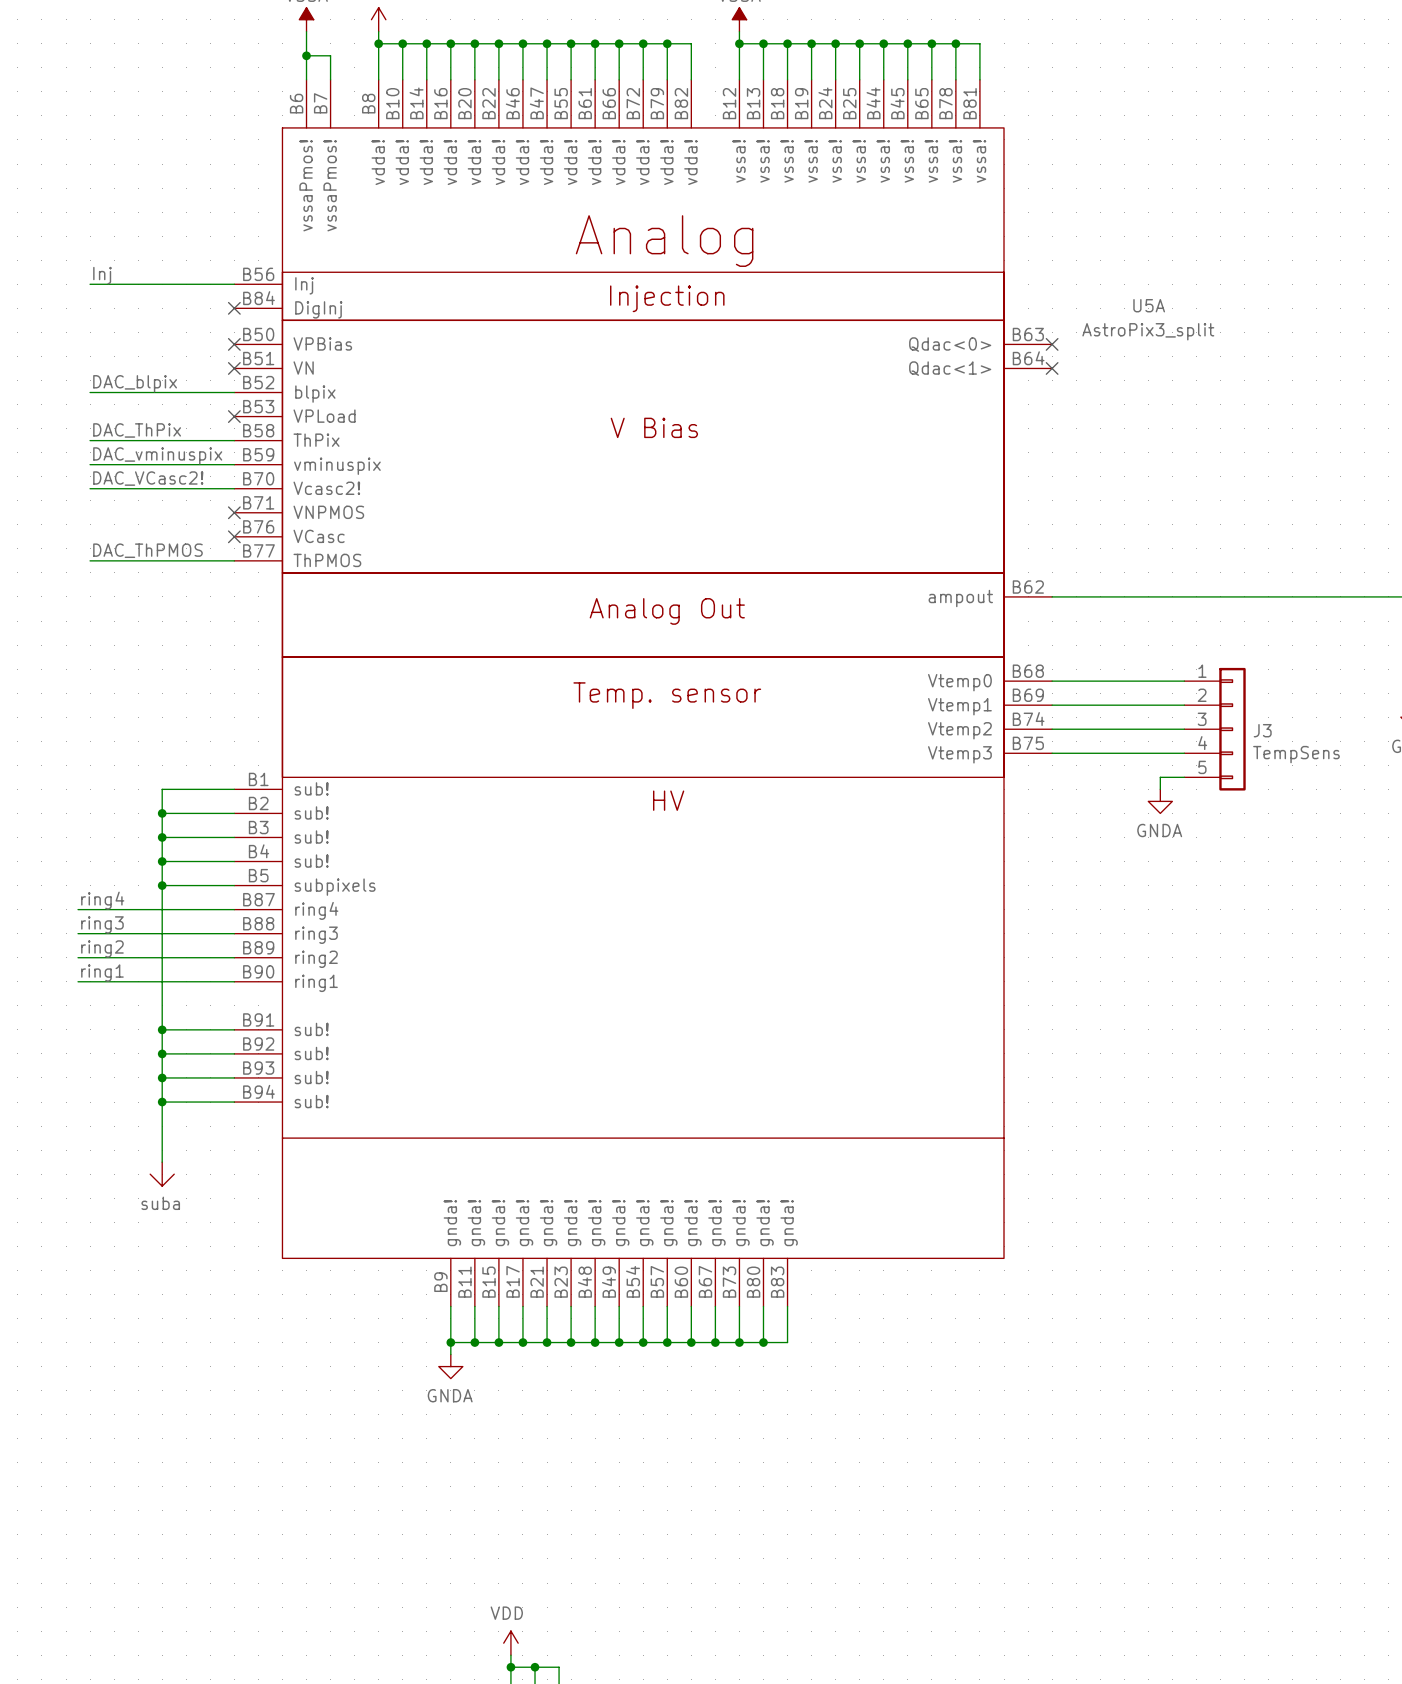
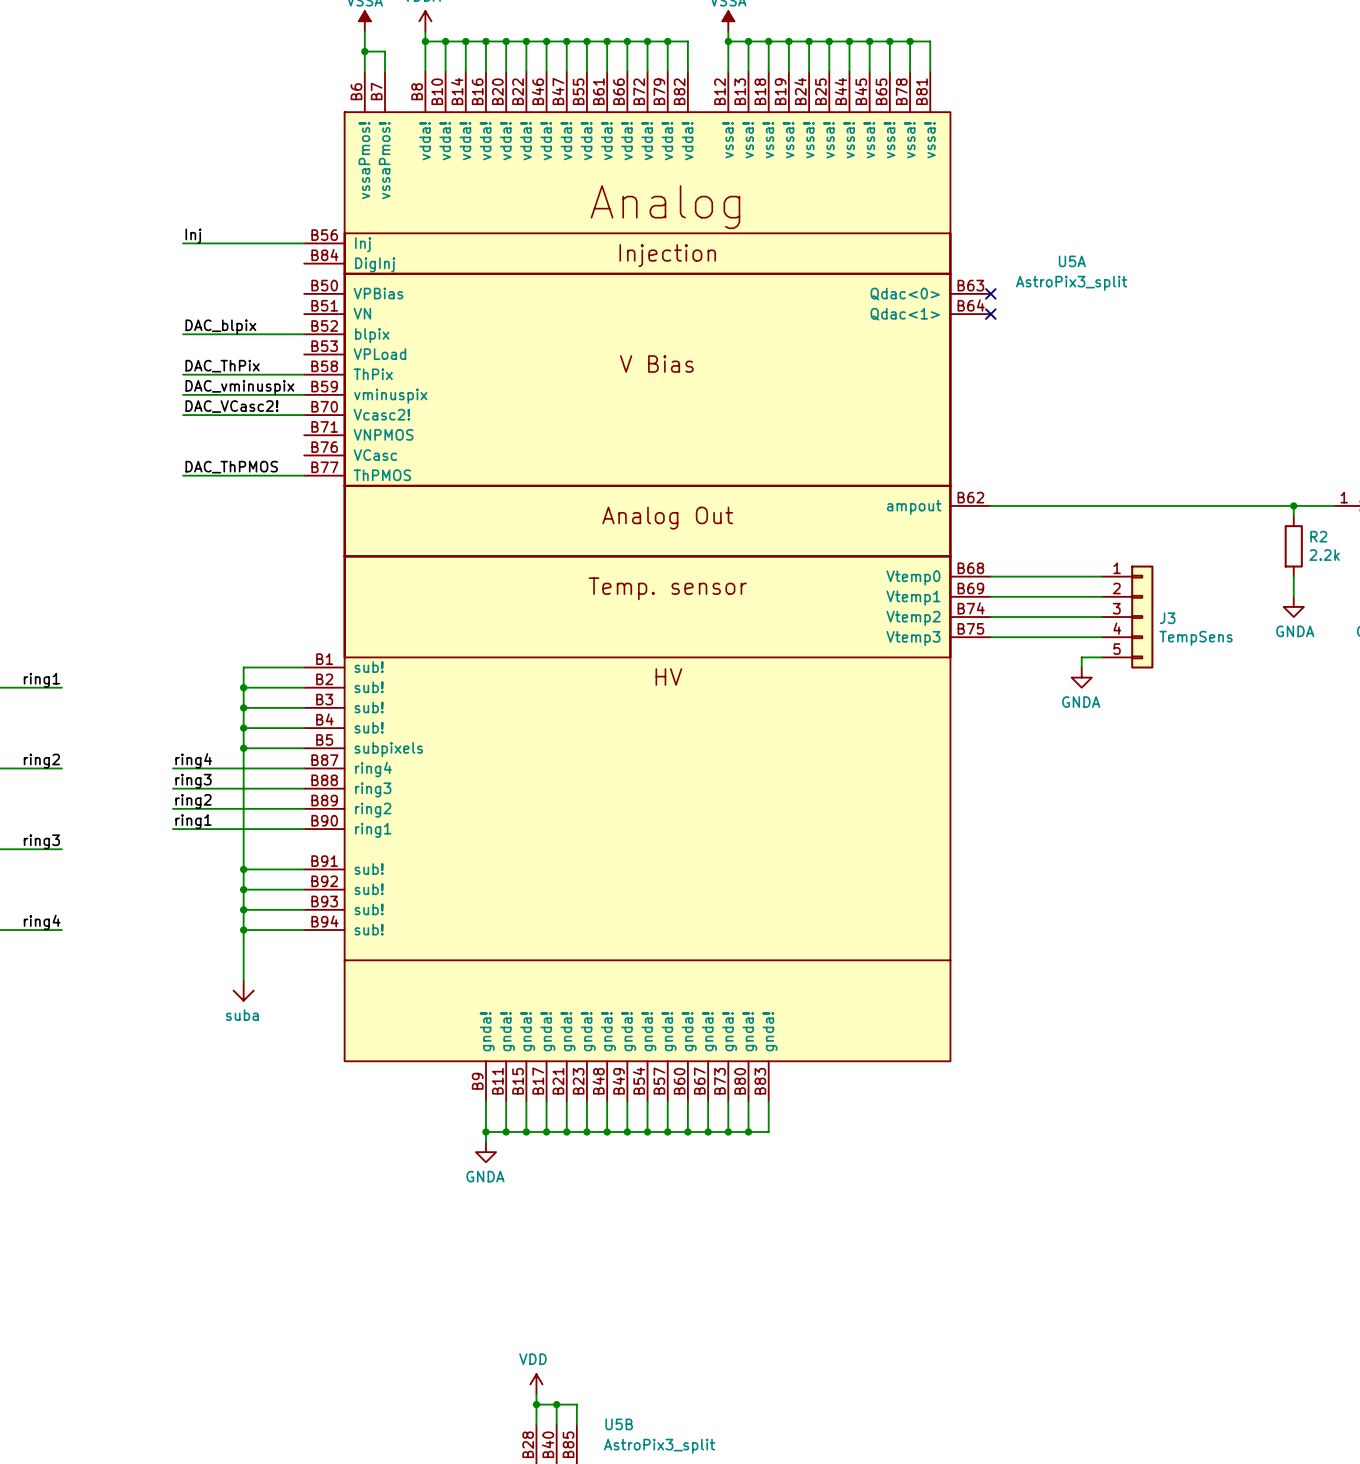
no-connect mark: (234, 308) -> none
no-connect mark: (234, 344) -> none
no-connect mark: (234, 368) -> none
no-connect mark: (234, 416) -> none
no-connect mark: (234, 512) -> none
no-connect mark: (234, 536) -> none

